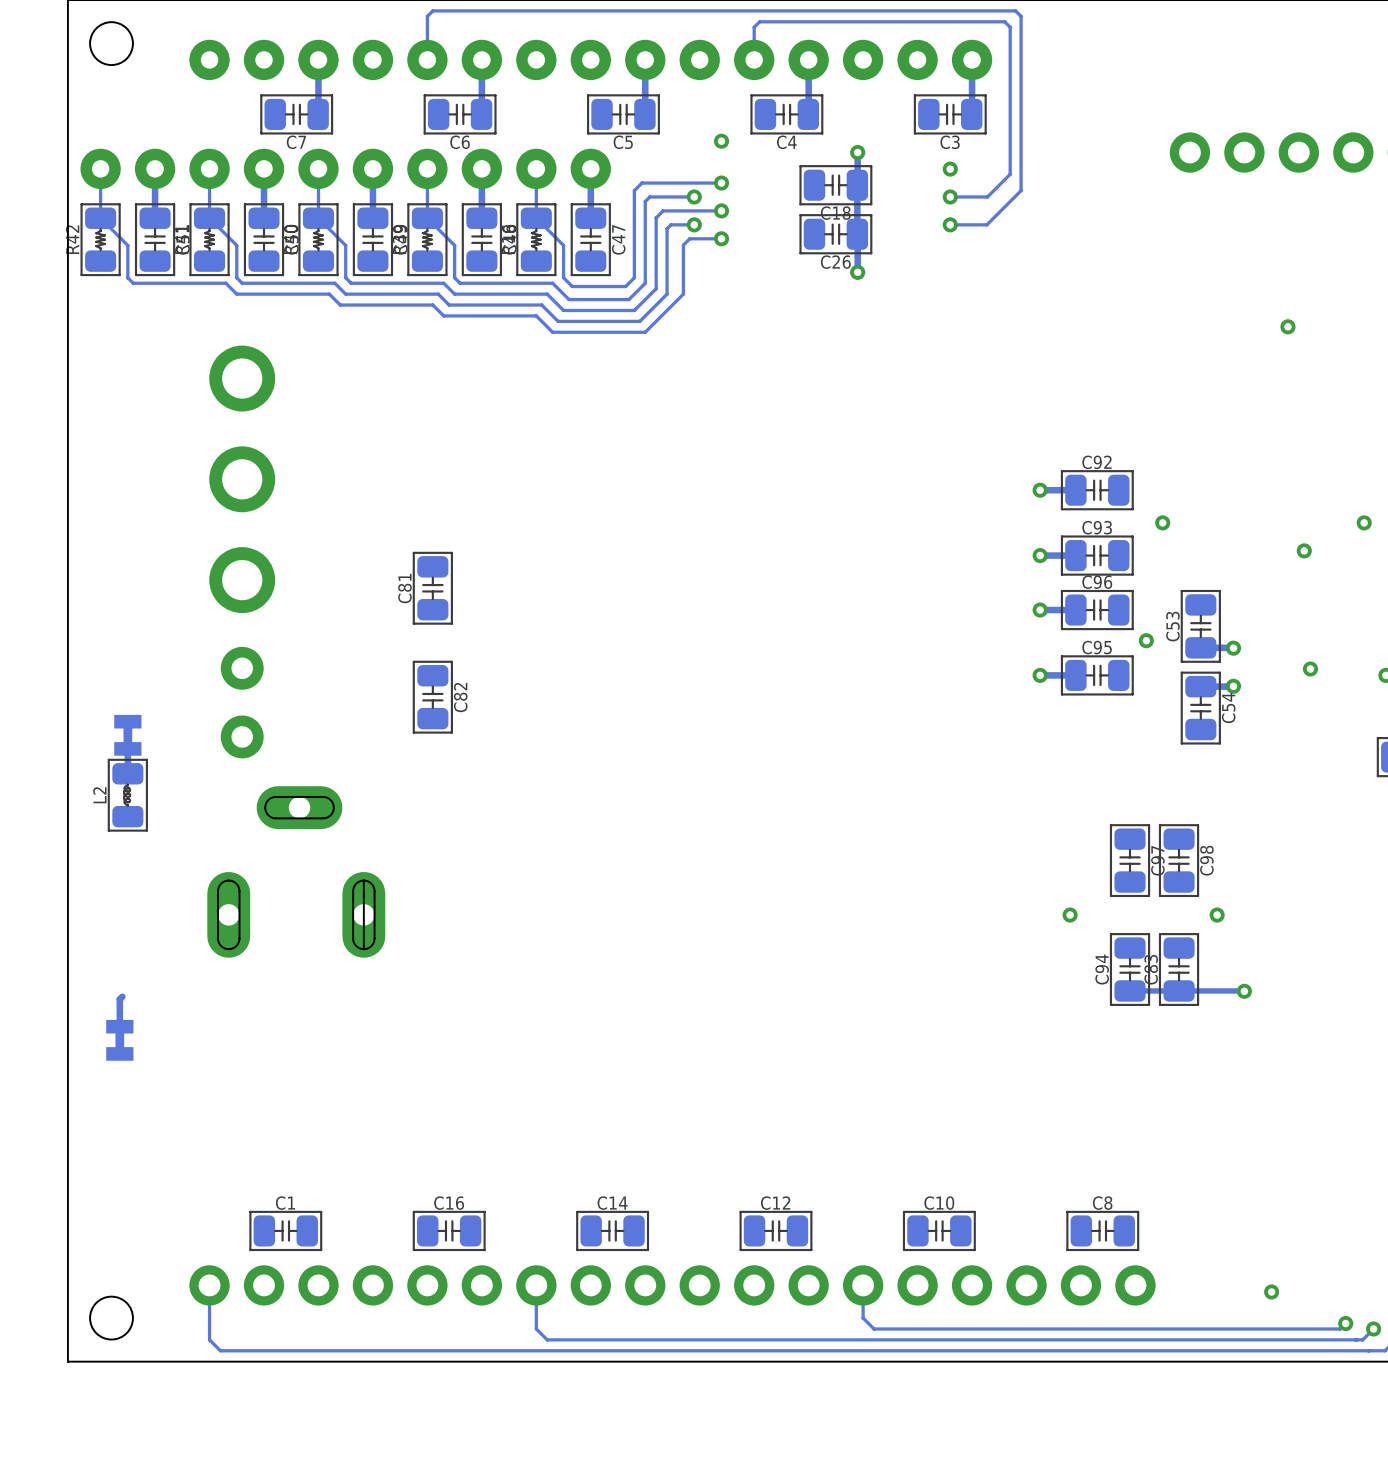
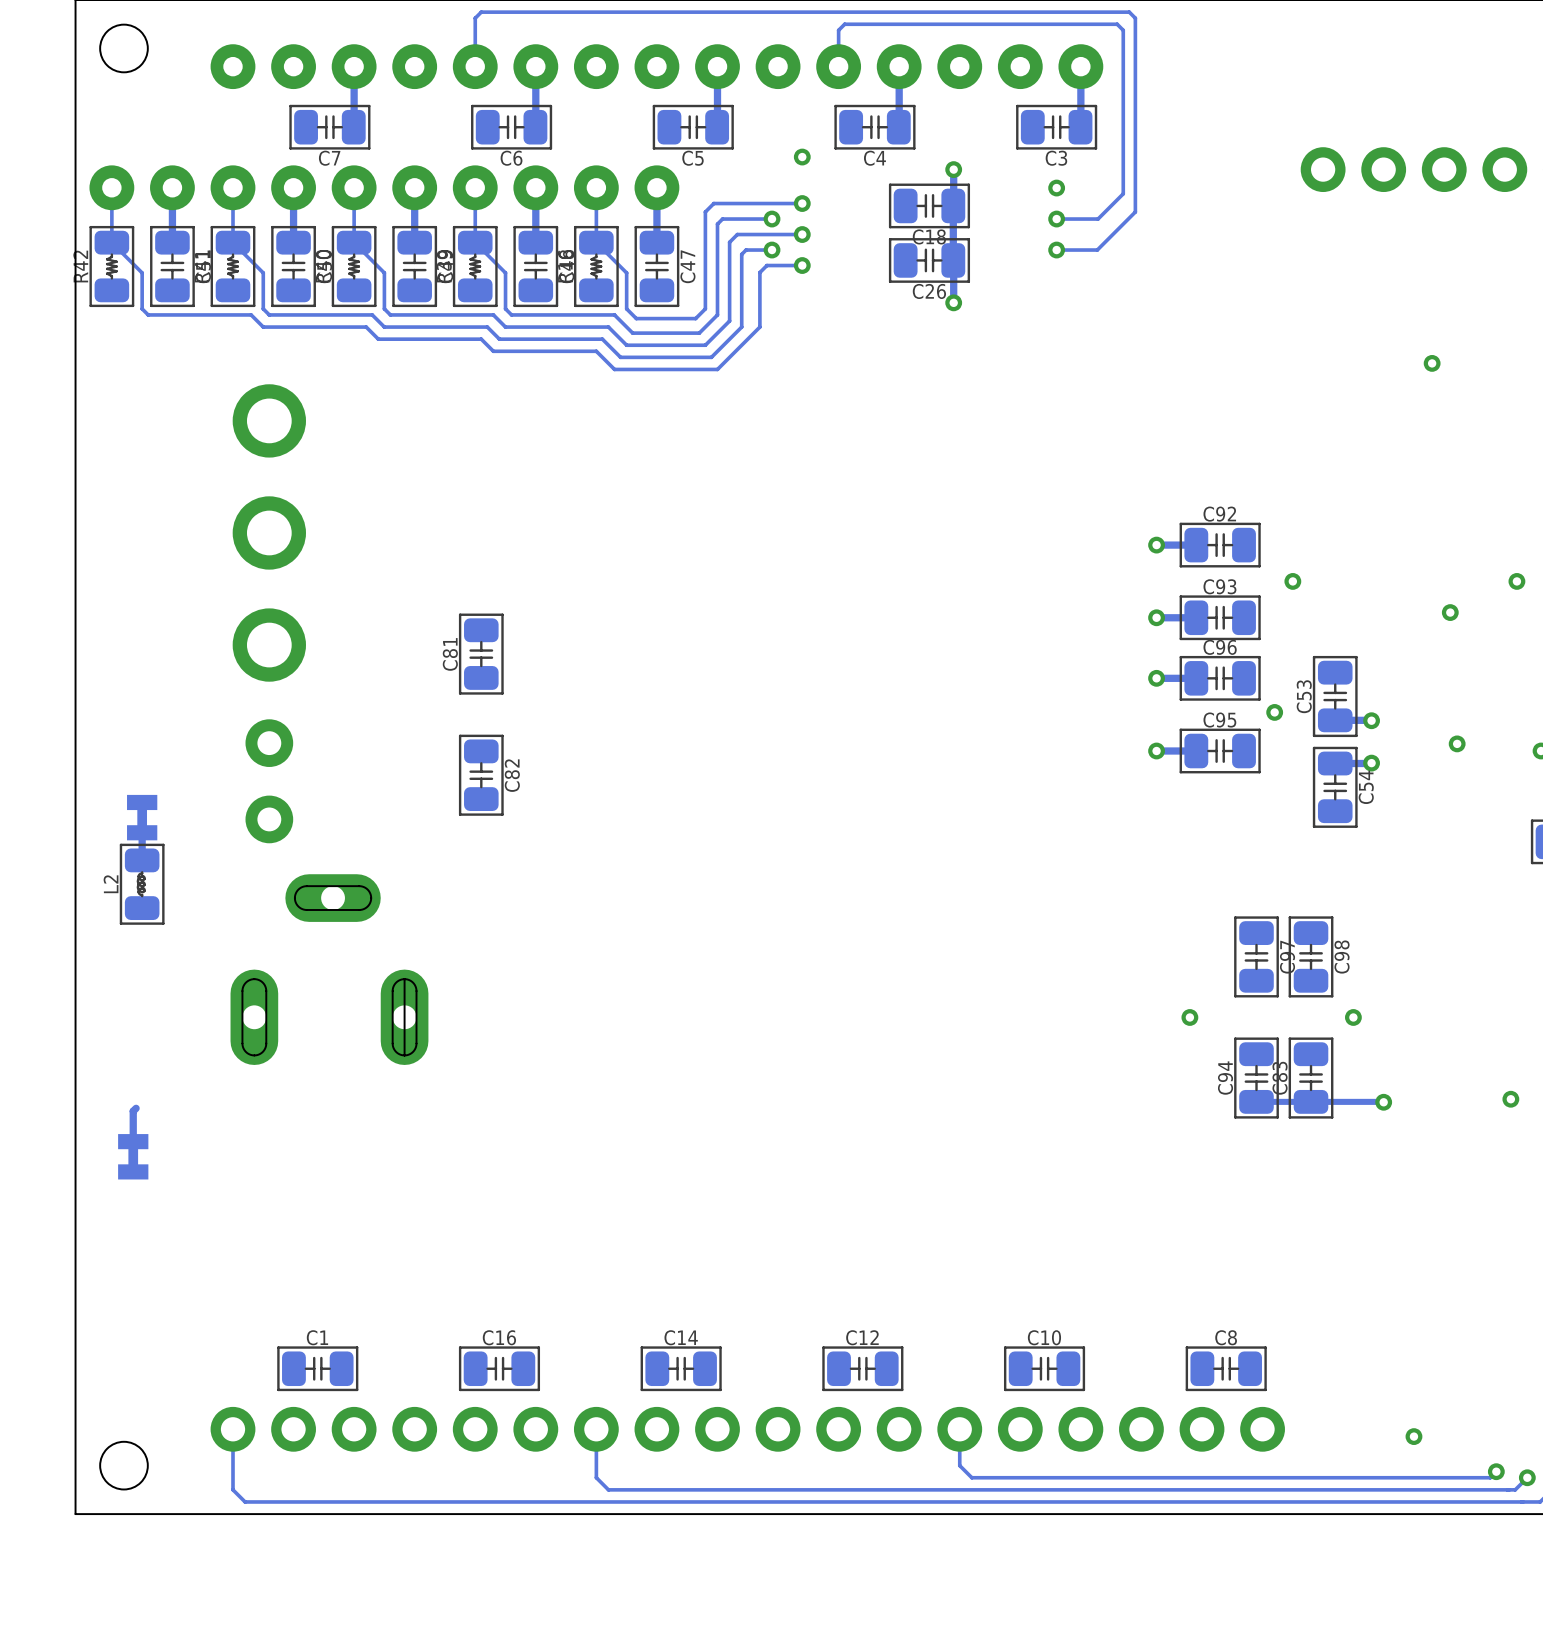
via: none -> (1510, 1099)

